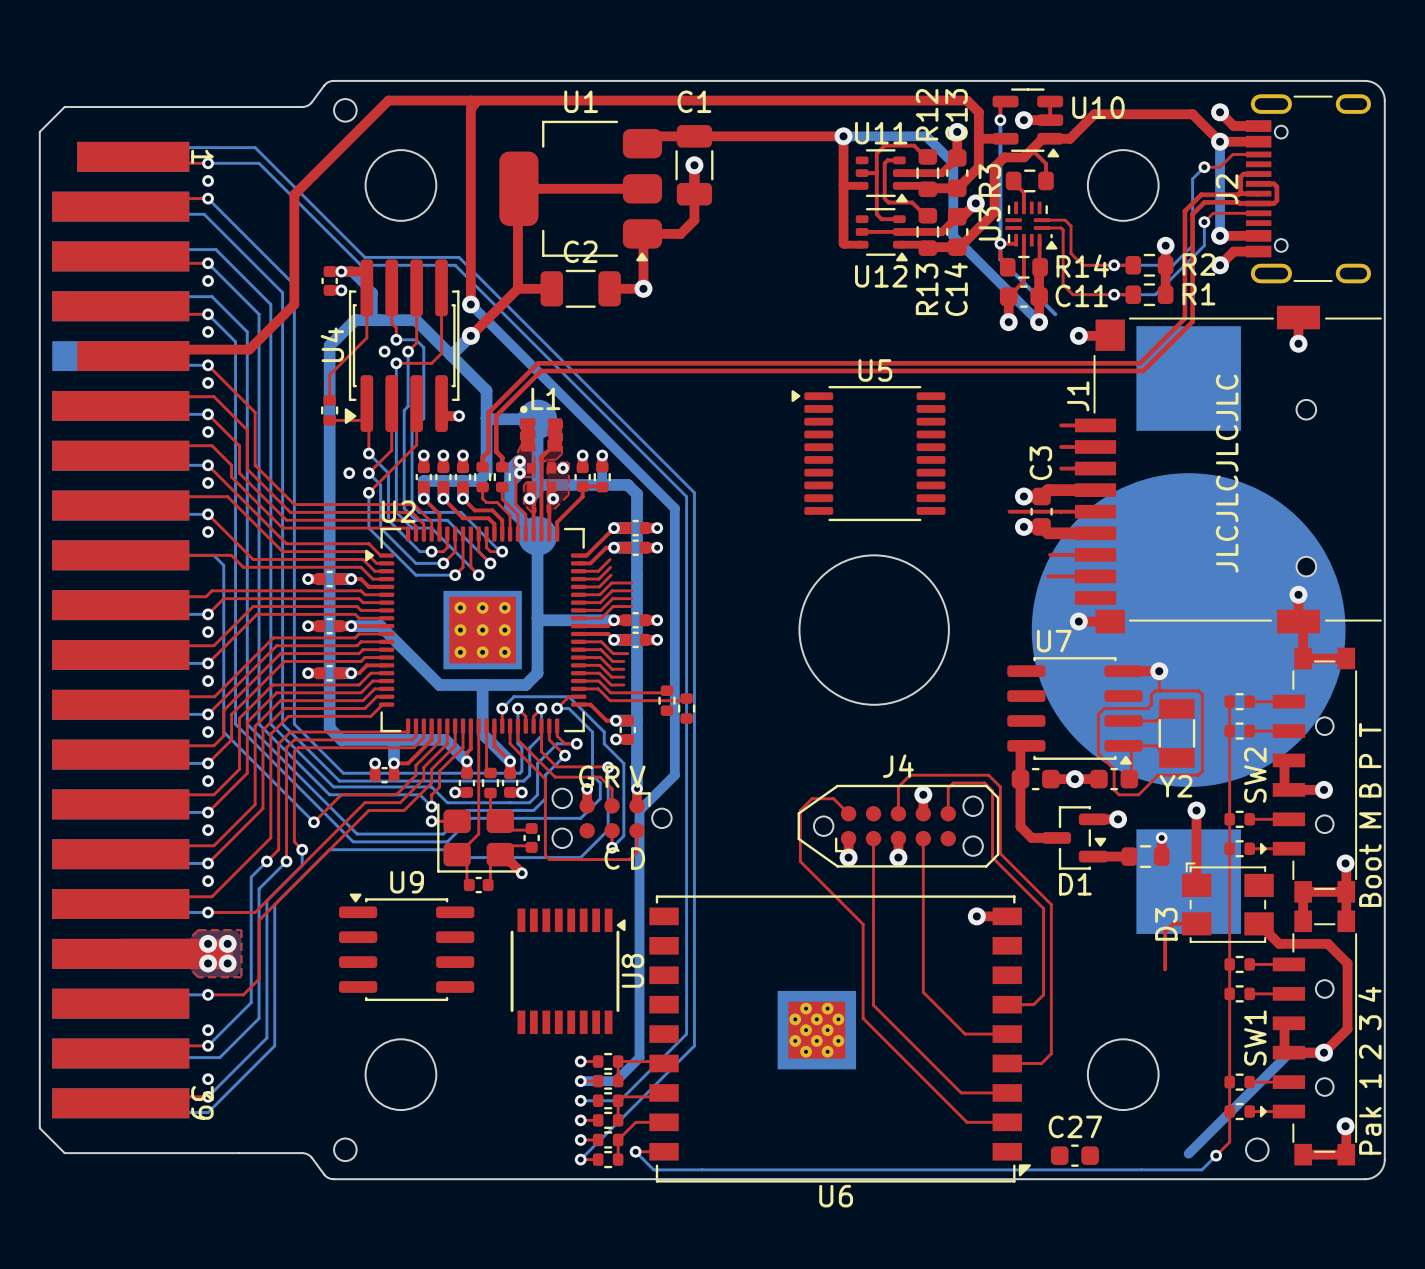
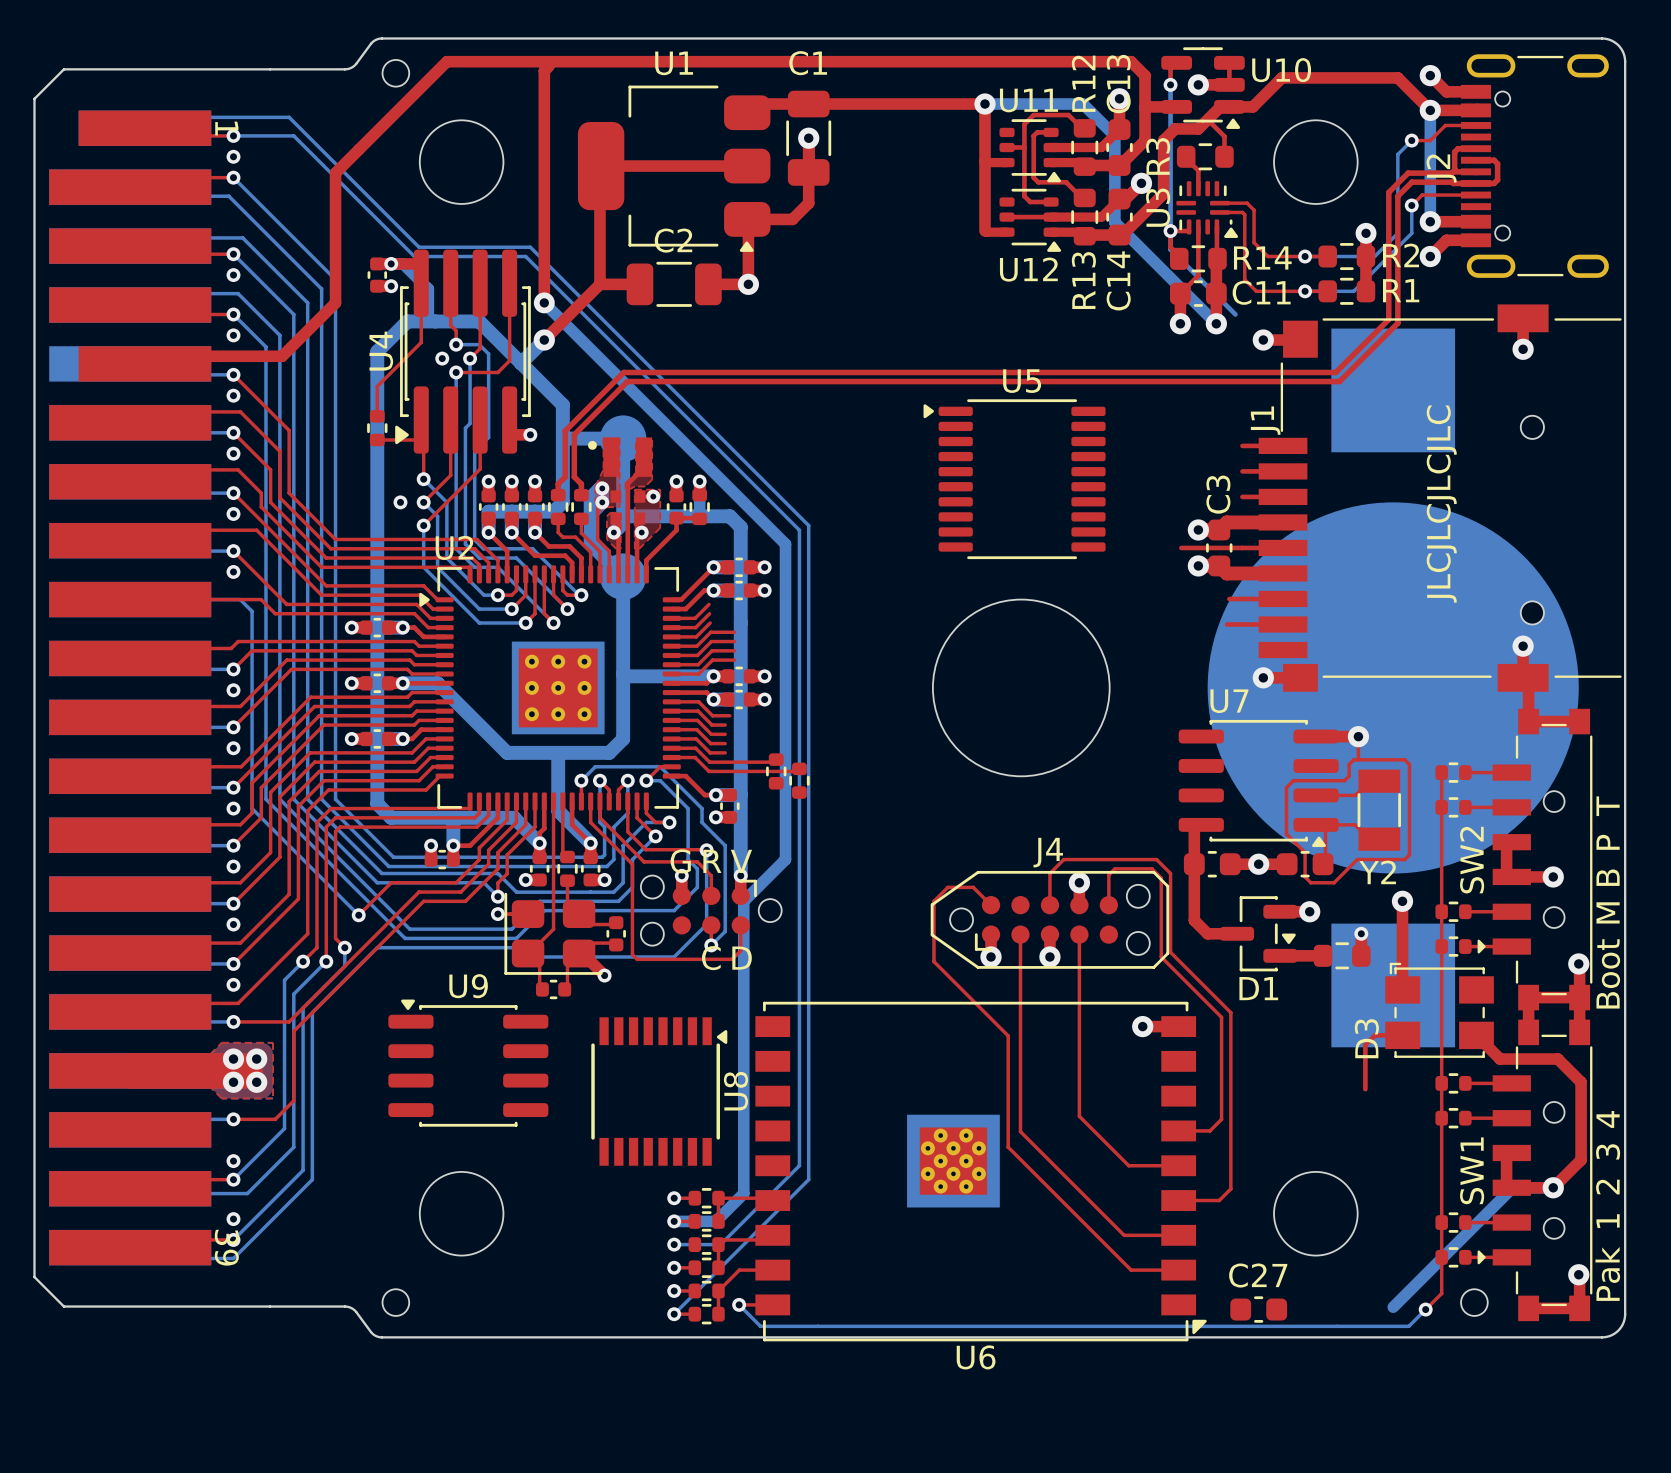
L1: (541, 428) -> none
part: none -> (620, 457)

